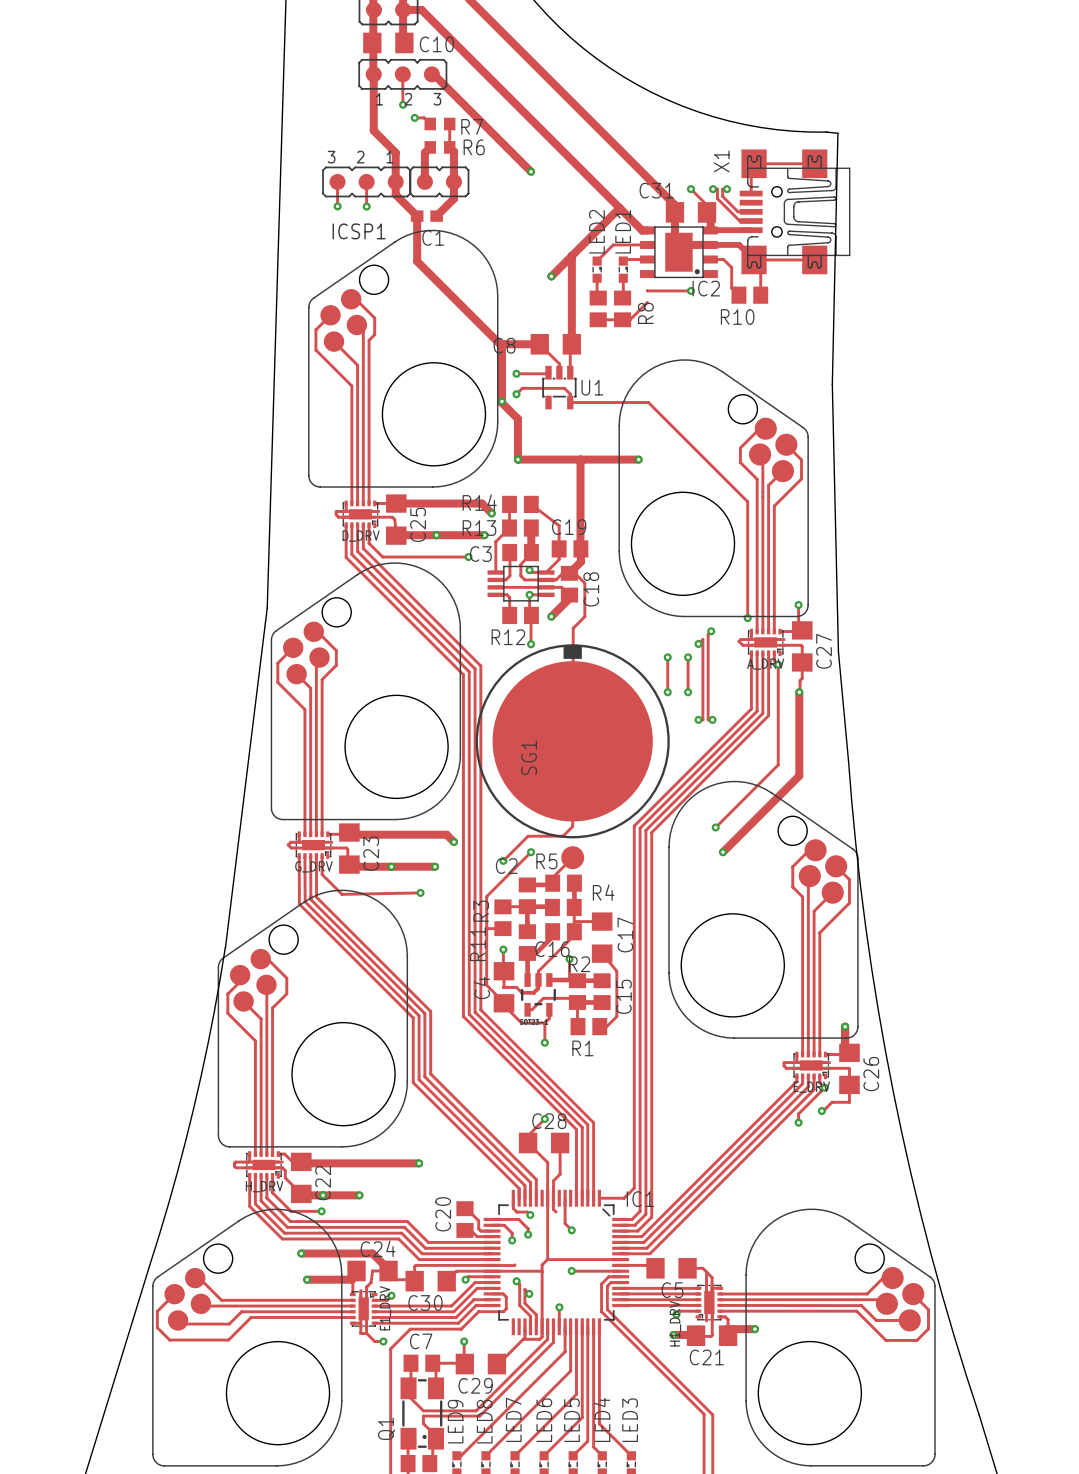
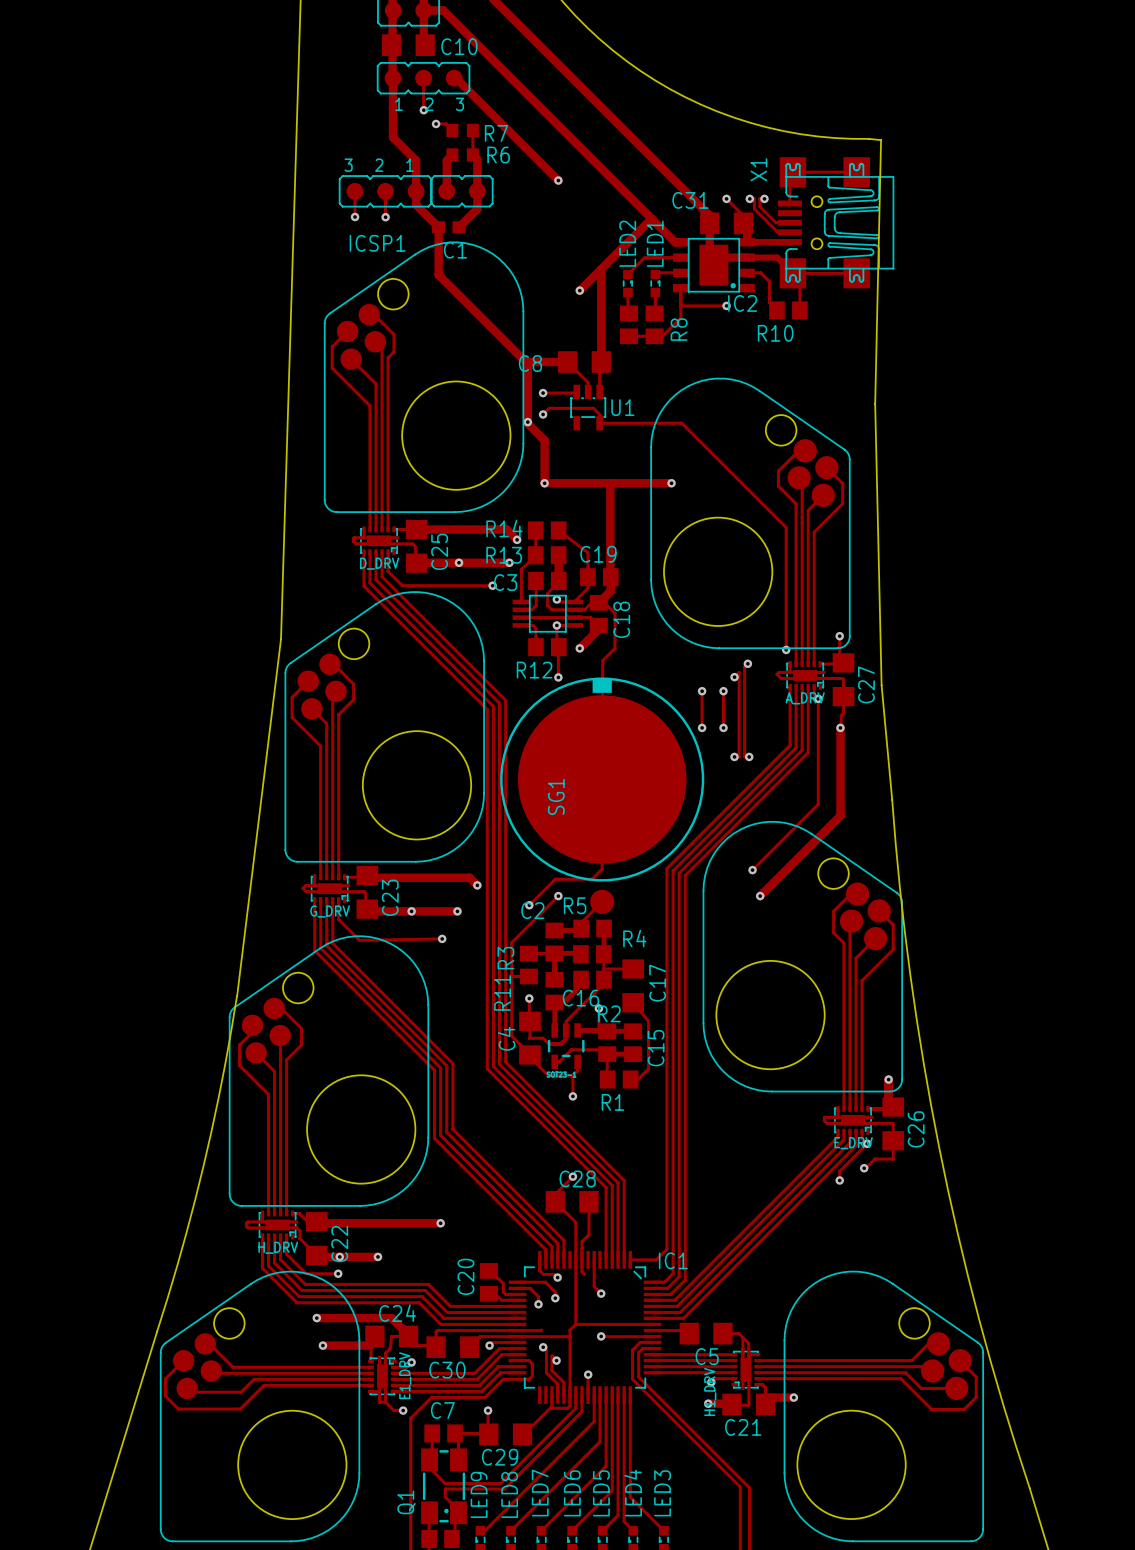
track: none -> (680, 288) (680, 318)

